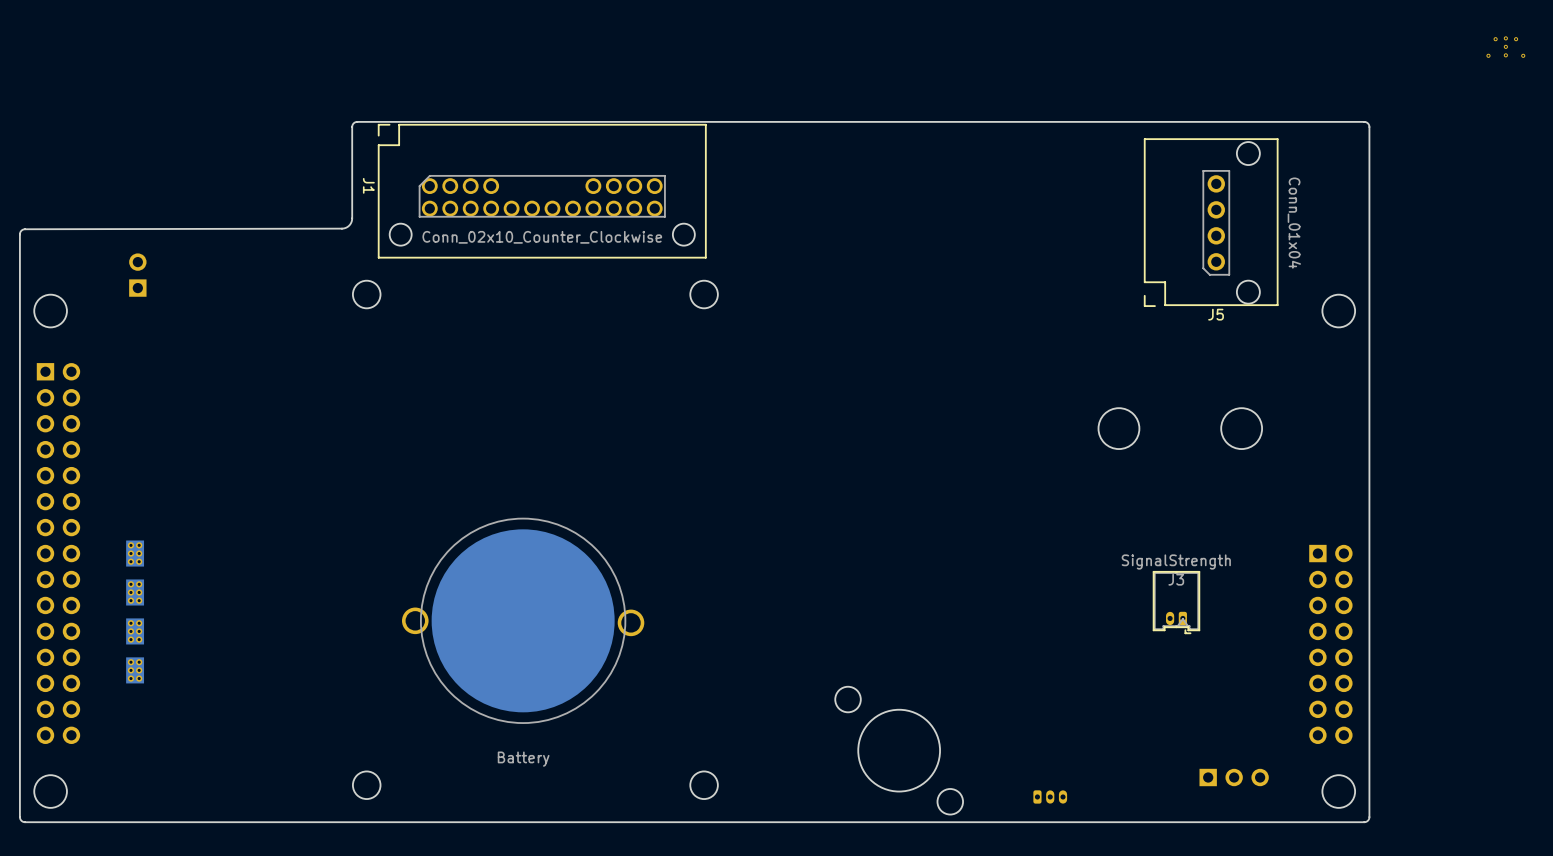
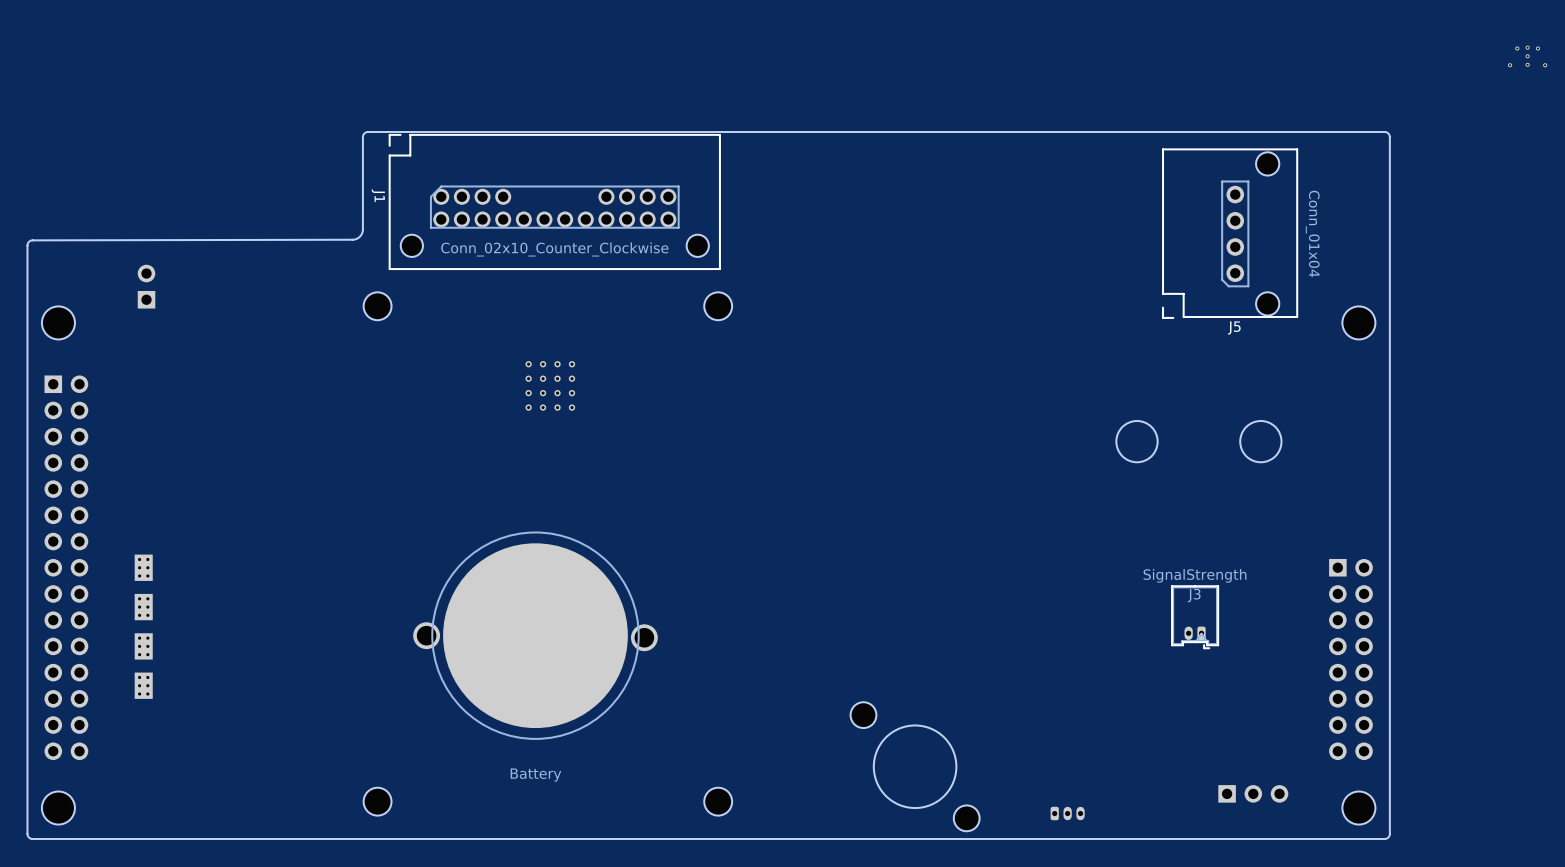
part: none -> (550, 385)

